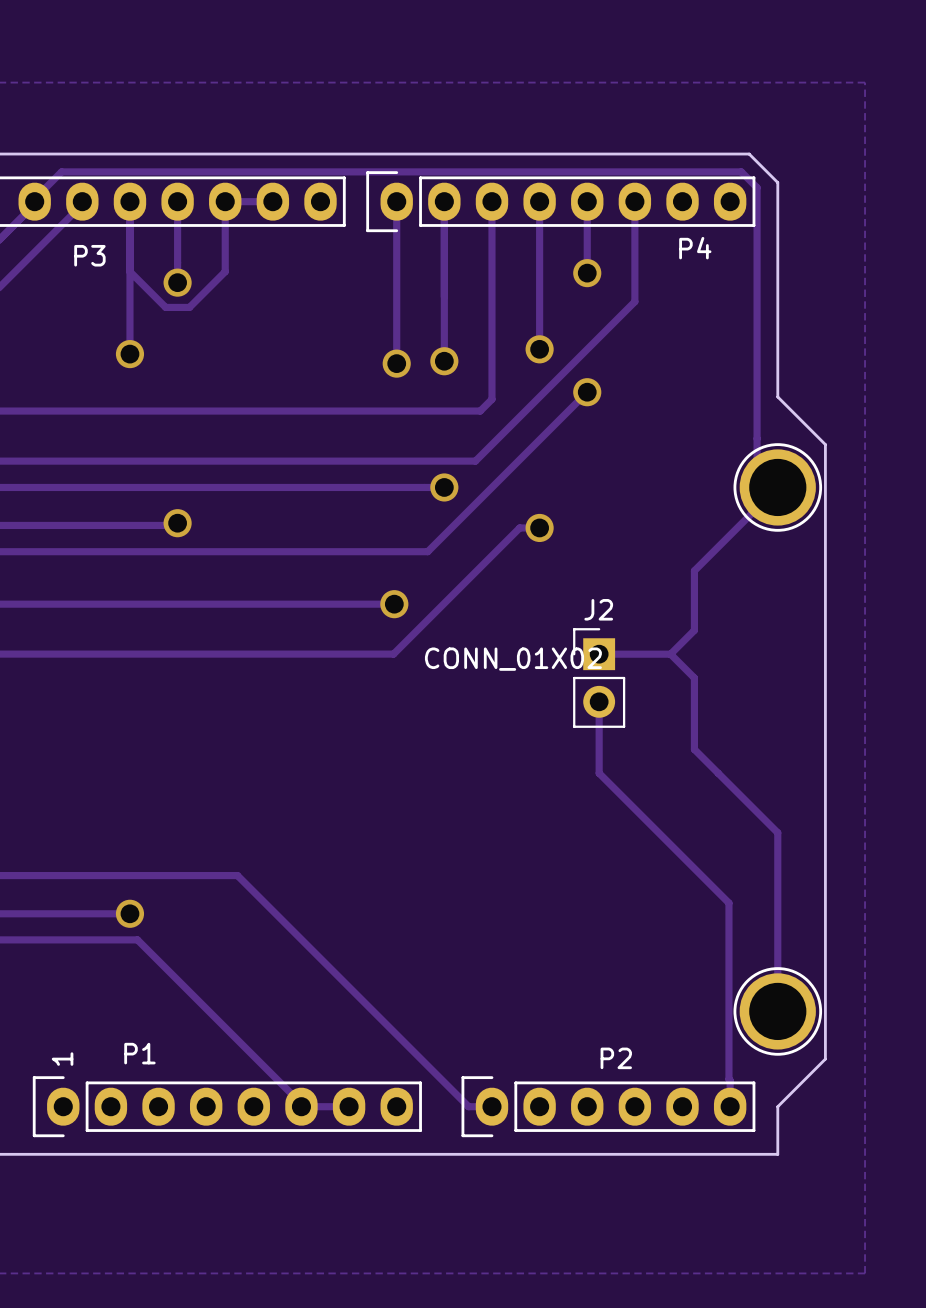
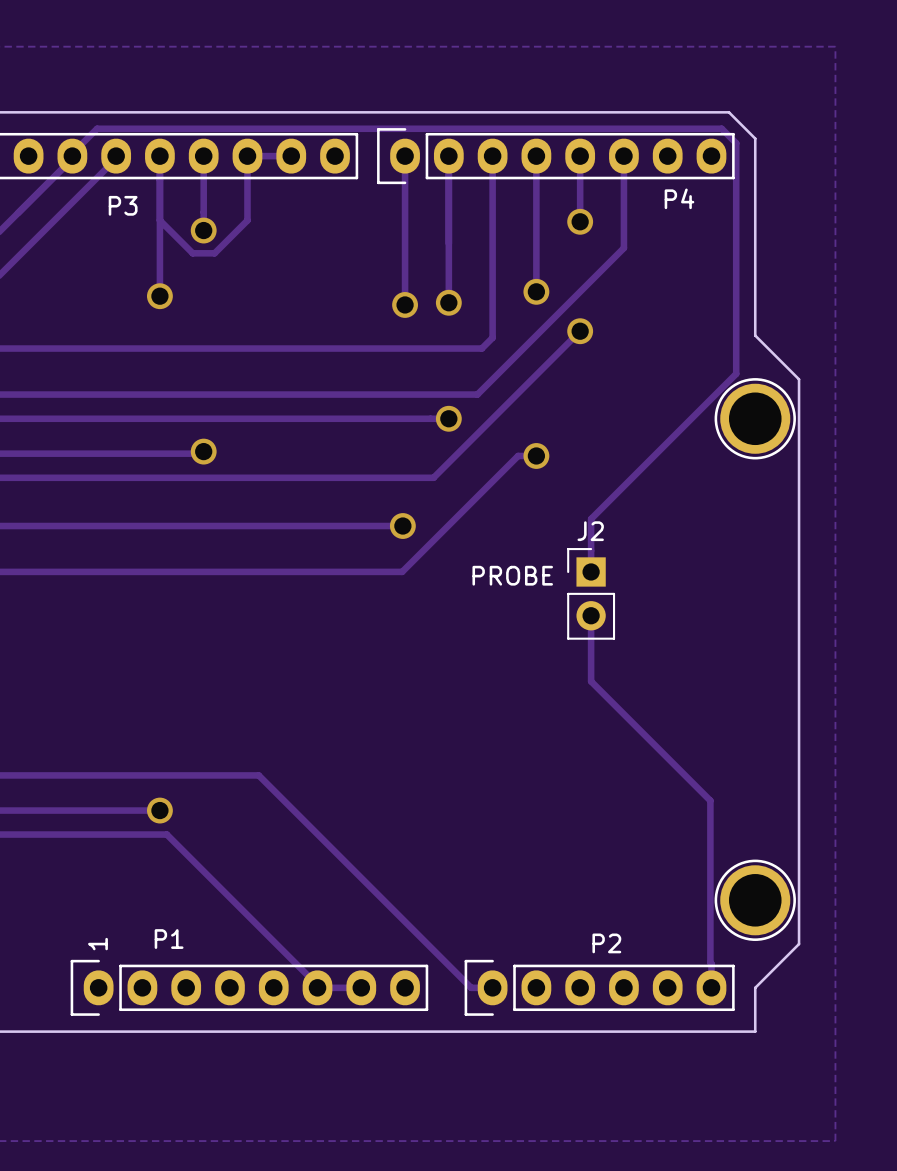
track: (757, 438) (757, 466) (777, 487) (694, 570) (694, 630) (670, 654) -> (736, 373) (591, 519) (591, 571)
track: (599, 654) (670, 654) -> none
track: (670, 654) (694, 678) (694, 749) (777, 832) (777, 1011) -> none
J2 value: CONN_01X02 (513, 659) -> PROBE (512, 575)

